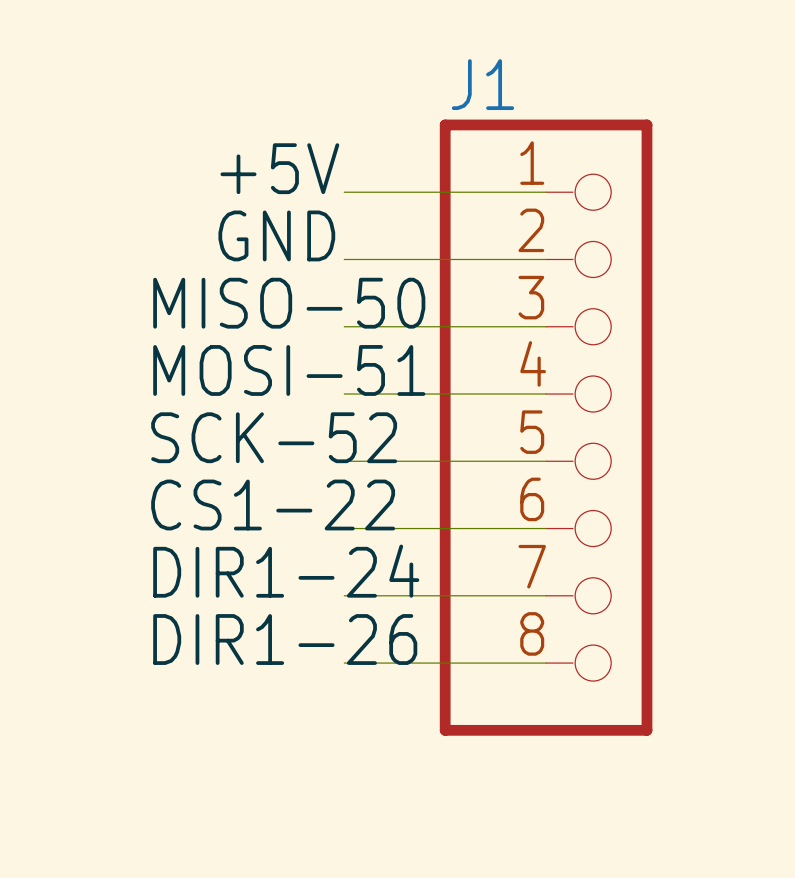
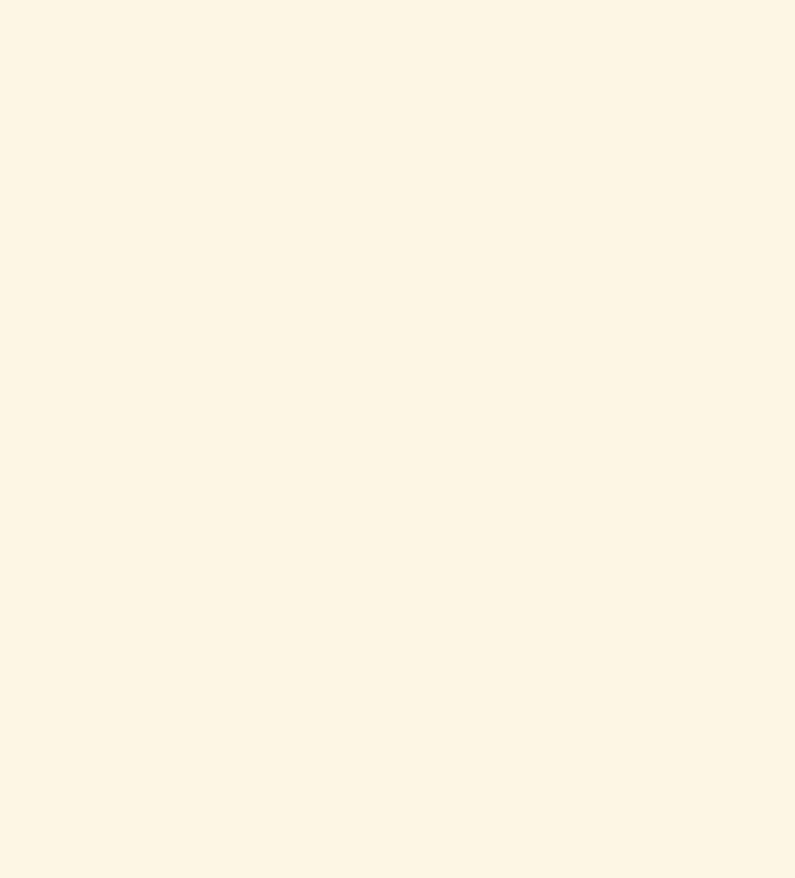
label: +5V (279, 168) -> none
wire: (344, 192) (546, 192) -> none
label: GND (276, 235) -> none
wire: (344, 259) (546, 259) -> none
label: MISO-50 (289, 303) -> none
wire: (344, 326) (546, 326) -> none
label: MOSI-51 (289, 370) -> none
wire: (344, 394) (546, 394) -> none
J1: (546, 427) -> none
label: SCK-52 (274, 437) -> none
wire: (344, 461) (546, 461) -> none
label: CS1-22 (273, 504) -> none
wire: (344, 528) (546, 528) -> none
label: DIR1-24 (286, 571) -> none
wire: (344, 595) (546, 595) -> none
label: DIR1-26 (285, 639) -> none
wire: (344, 663) (546, 663) -> none

